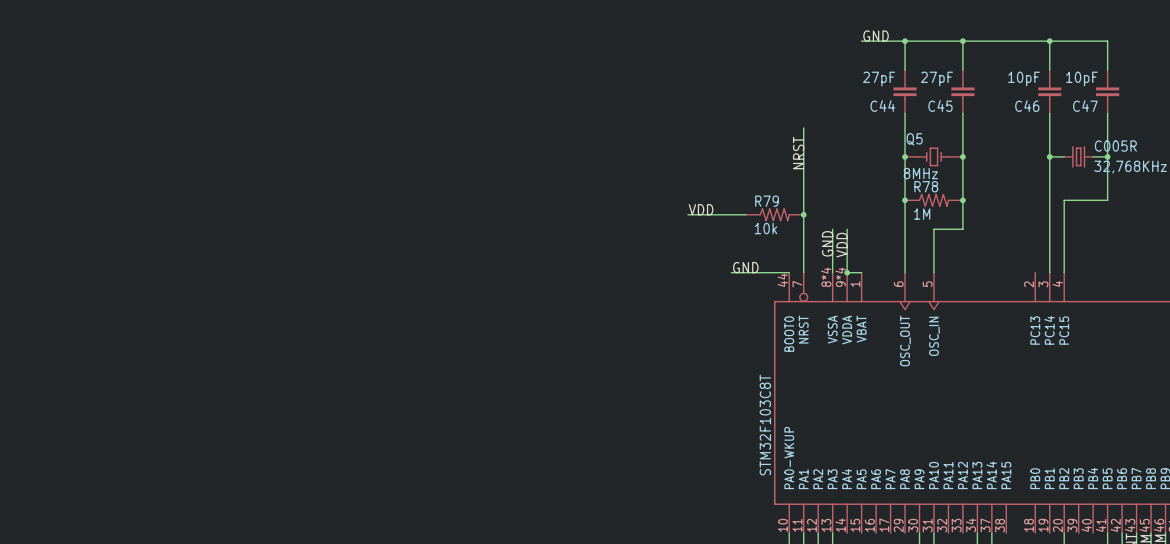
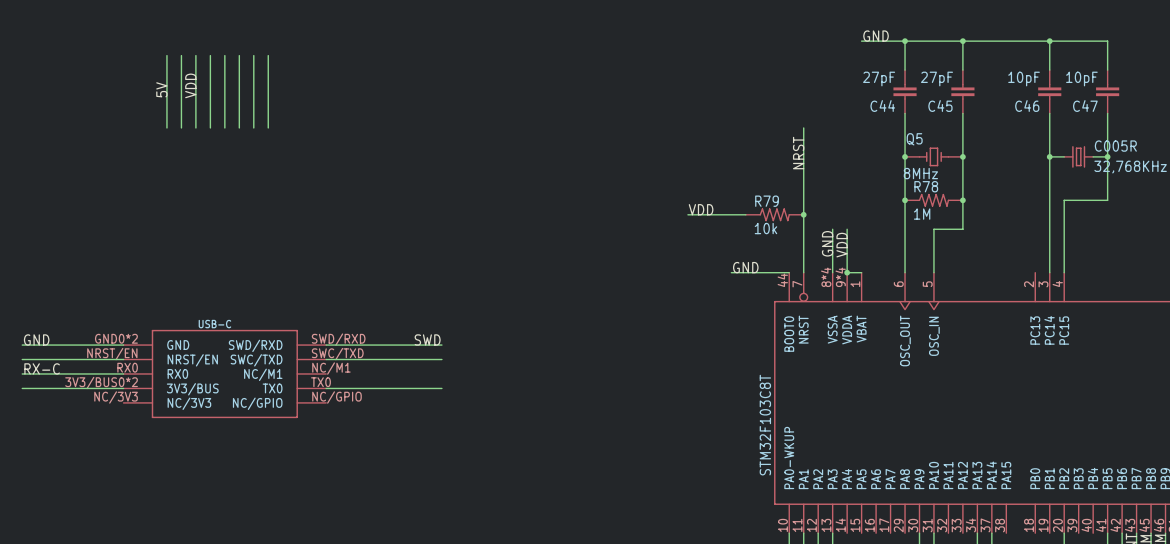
wire: none -> (166, 55) (166, 127)
wire: none -> (181, 55) (181, 127)
wire: none -> (195, 55) (195, 127)
wire: none -> (210, 55) (210, 127)
wire: none -> (224, 55) (224, 127)
wire: none -> (239, 55) (239, 127)
wire: none -> (253, 55) (253, 127)
wire: none -> (268, 55) (268, 127)
label: none -> VDD (190, 85)
label: none -> 5V (161, 89)
label: none -> GND (36, 339)
label: none -> SWD (427, 339)
wire: none -> (22, 345) (123, 345)
wire: none -> (326, 345) (441, 345)
wire: none -> (22, 359) (123, 359)
wire: none -> (326, 359) (441, 359)
label: none -> RX-C (42, 368)
wire: none -> (22, 373) (123, 373)
part: none -> (224, 373)
wire: none -> (22, 388) (123, 388)
wire: none -> (326, 388) (441, 388)

